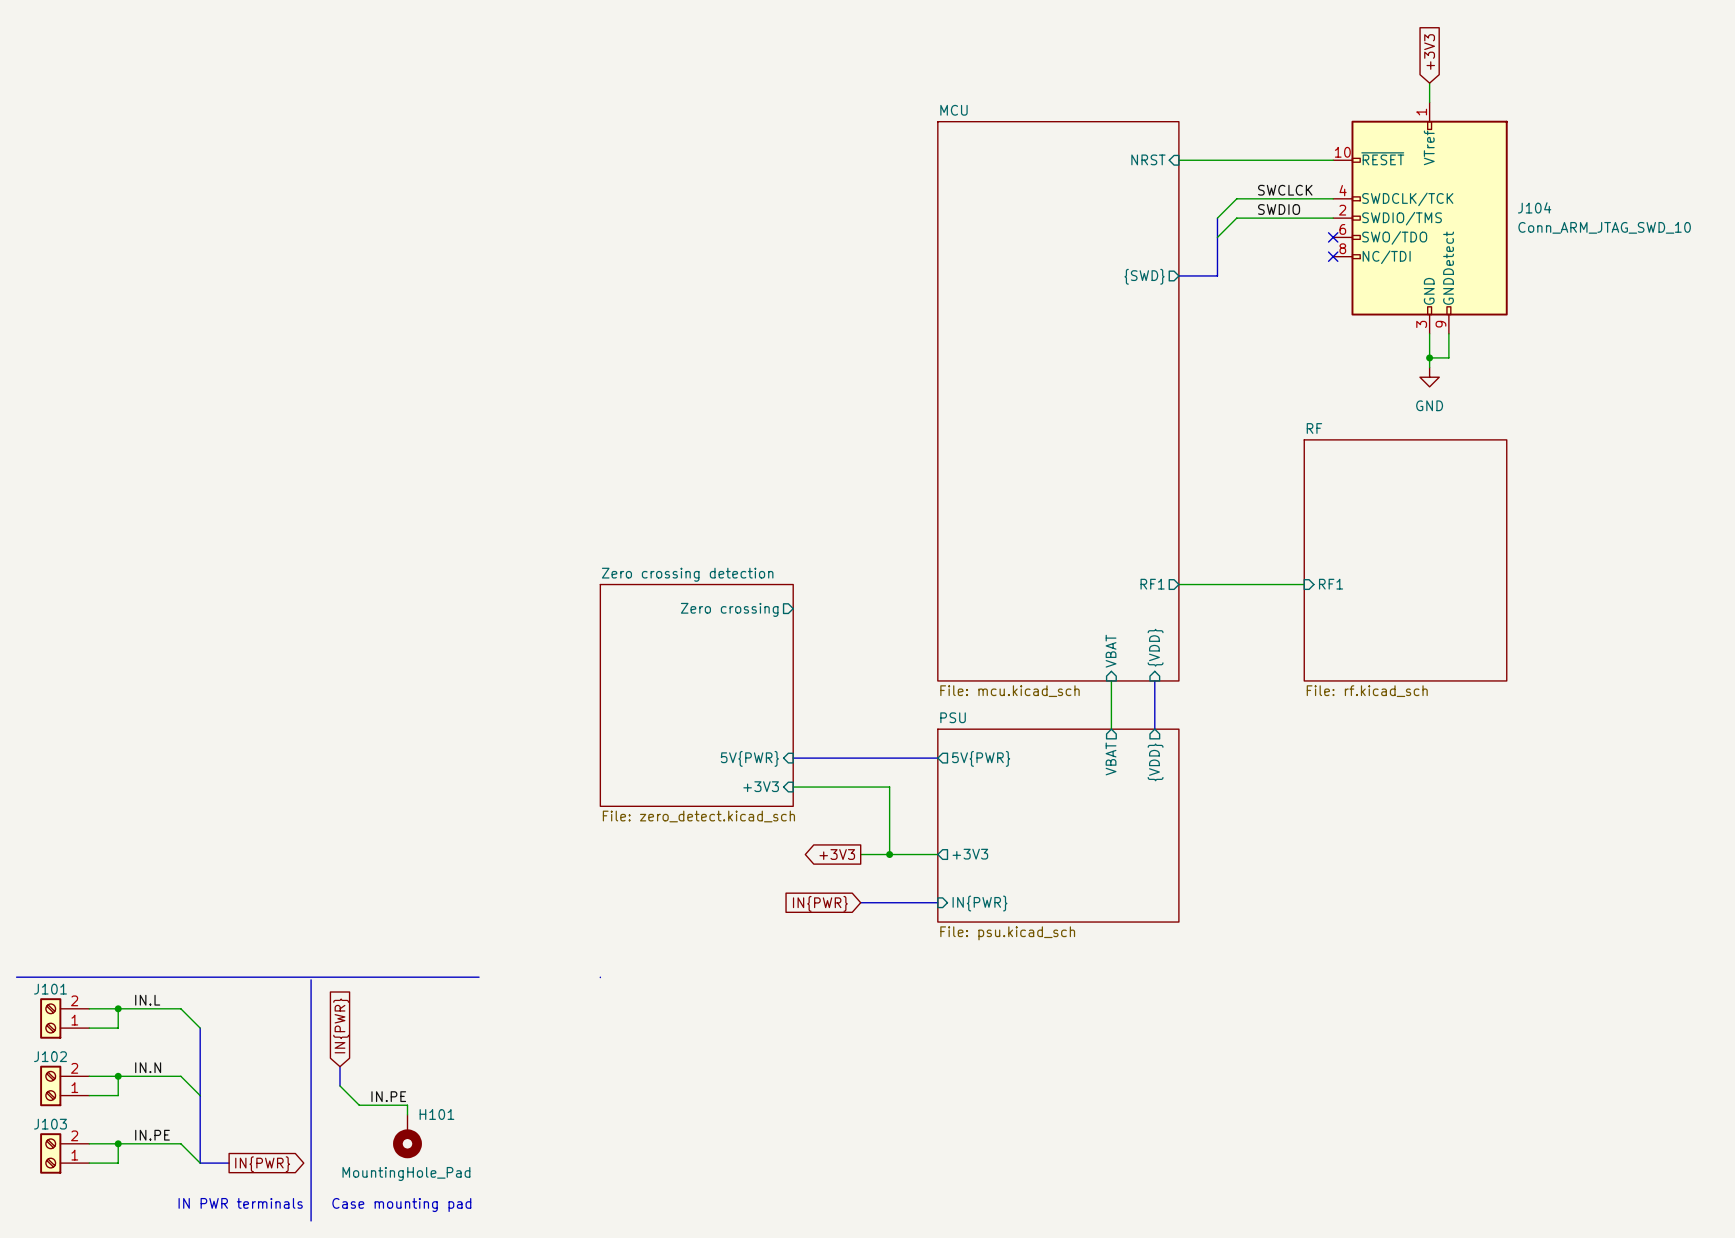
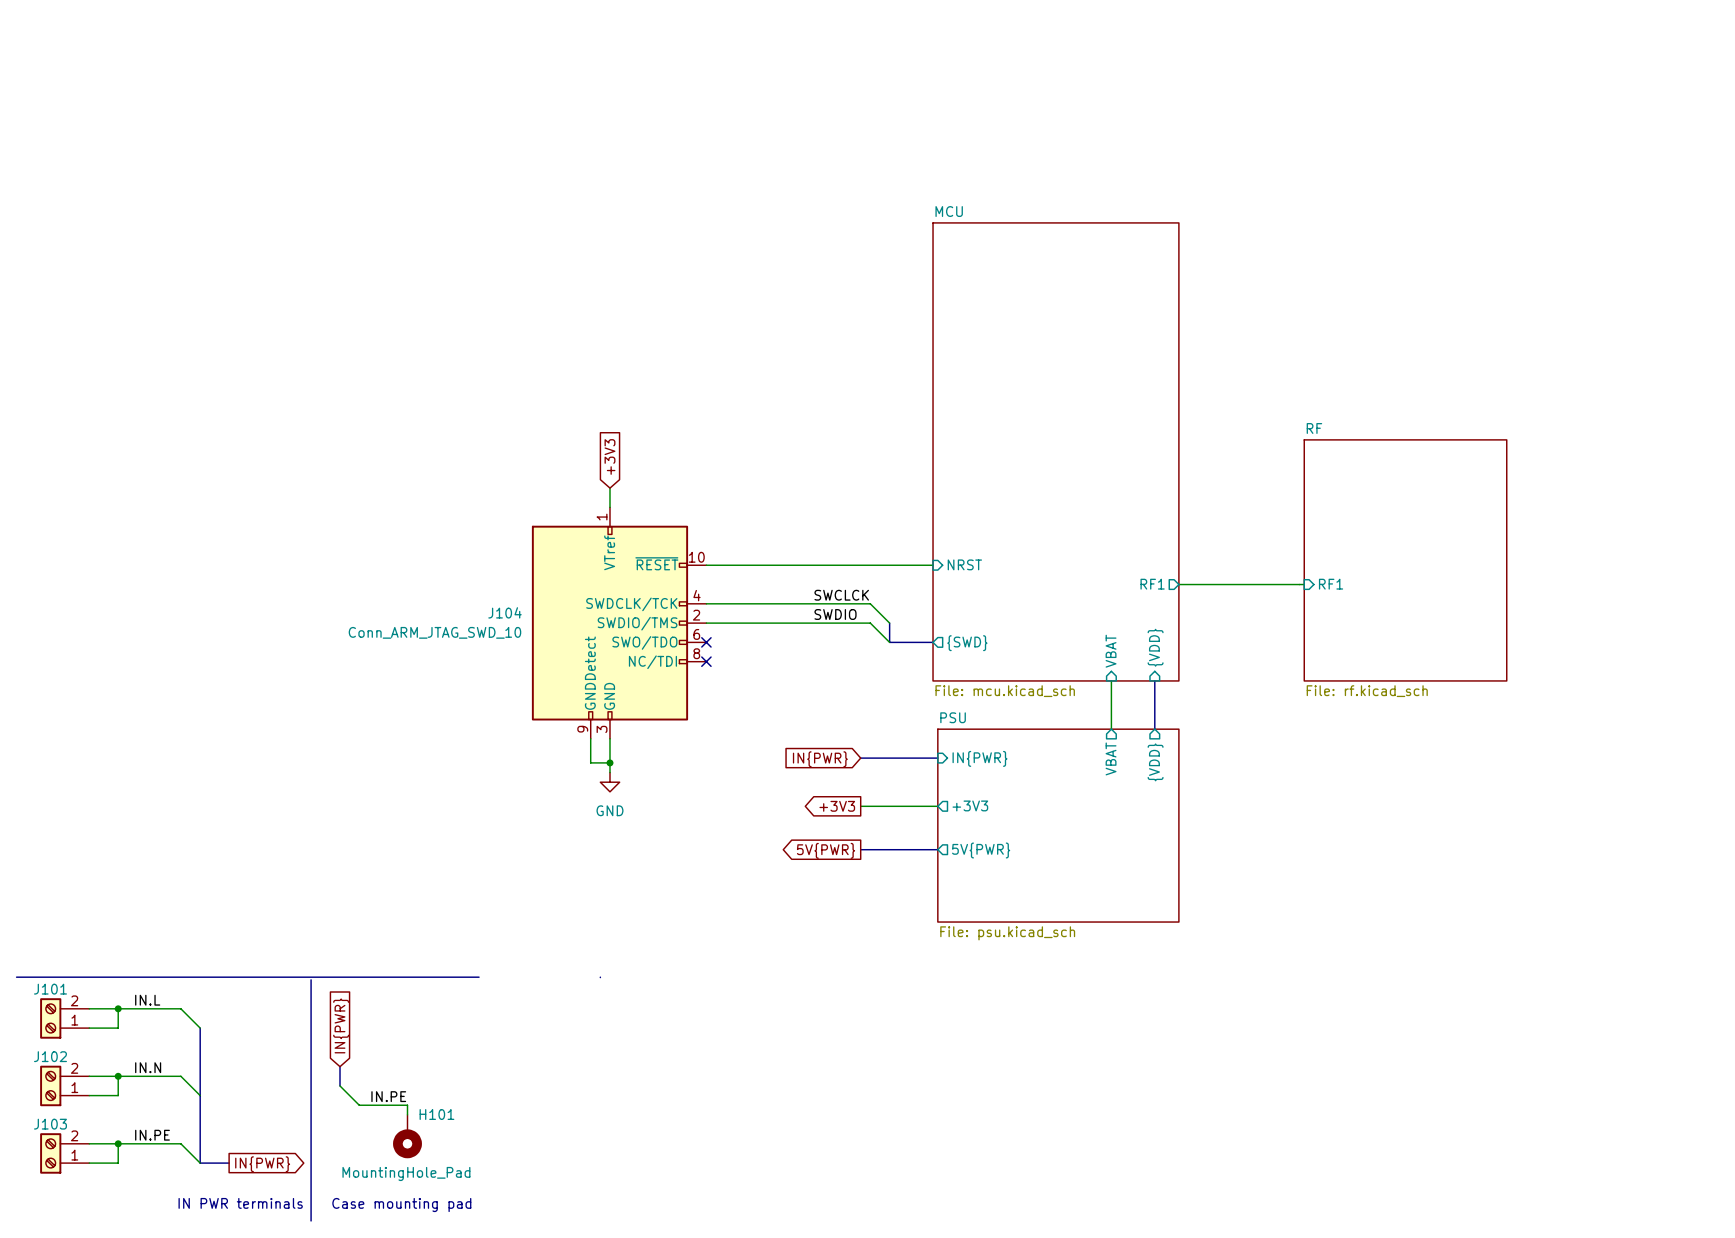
global label: +3V3 (1429, 51) -> none
wire: (1429, 83) (1429, 102) -> none
sheet pin: NRST (1148, 159) -> none
wire: (1178, 160) (1333, 160) -> none
label: SWCLCK (1285, 190) -> none
wire: (1333, 198) (1236, 198) (1217, 218) -> none
label: SWDIO (1279, 209) -> none
bus: (1217, 218) (1217, 275) (1178, 275) -> none
wire: (1333, 218) (1236, 218) (1217, 237) -> none
J104 position: (1420, 218) -> (619, 623)
J104 flip: as is (1429, 218) -> left-right (609, 623)
no-connect mark: (1333, 237) -> none
no-connect mark: (1333, 256) -> none
sheet pin: {SWD} (1144, 276) -> none
wire: (1429, 333) (1429, 367) -> none
wire: (1448, 333) (1448, 357) (1429, 357) -> none
junction: (1429, 357) -> none
power symbol: GND (1429, 377) -> none
sheet MCU: File: mcu.kicad_sch (1058, 401) -> none
sheet MCU: none -> File: mcu.kicad_sch (1055, 451)
global label: none -> +3V3 (609, 456)
wire: none -> (609, 488) (609, 507)
sheet pin: none -> NRST (964, 564)
wire: none -> (706, 565) (933, 565)
label: none -> SWCLCK (841, 595)
wire: none -> (706, 603) (870, 603) (889, 623)
sheet pin: Zero crossing (729, 609) -> none
label: none -> SWDIO (835, 614)
wire: none -> (706, 623) (870, 623) (889, 642)
bus: none -> (889, 623) (889, 642) (933, 642)
no-connect mark: none -> (706, 642)
sheet pin: none -> {SWD} (967, 643)
no-connect mark: none -> (706, 661)
sheet Zero crossing detection: File: zero_detect.kicad_sch (696, 695) -> none
wire: none -> (590, 738) (590, 762) (609, 762)
wire: none -> (609, 738) (609, 772)
sheet pin: 5V{PWR} (749, 758) -> none
bus: (793, 758) (860, 758) -> none
sheet pin shape: output (981, 758) -> input (980, 758)
sheet pin: 5V{PWR} (981, 758) -> IN{PWR} (980, 758)
junction: none -> (609, 762)
power symbol: none -> GND (609, 782)
sheet pin: +3V3 (761, 786) -> none
wire: (793, 787) (889, 787) (889, 854) -> none
global label: none -> 5V{PWR} (826, 850)
sheet pin: none -> 5V{PWR} (981, 850)
global label position: +3V3 (837, 854) -> +3V3 (837, 806)
wire: (860, 854) (937, 854) -> (860, 806) (937, 806)
junction: (889, 854) -> none
sheet pin position: +3V3 (970, 854) -> +3V3 (970, 805)
bus: (860, 902) (937, 902) -> (860, 849) (937, 849)
global label position: IN{PWR} (820, 903) -> IN{PWR} (820, 759)
sheet pin: IN{PWR} (980, 903) -> none

